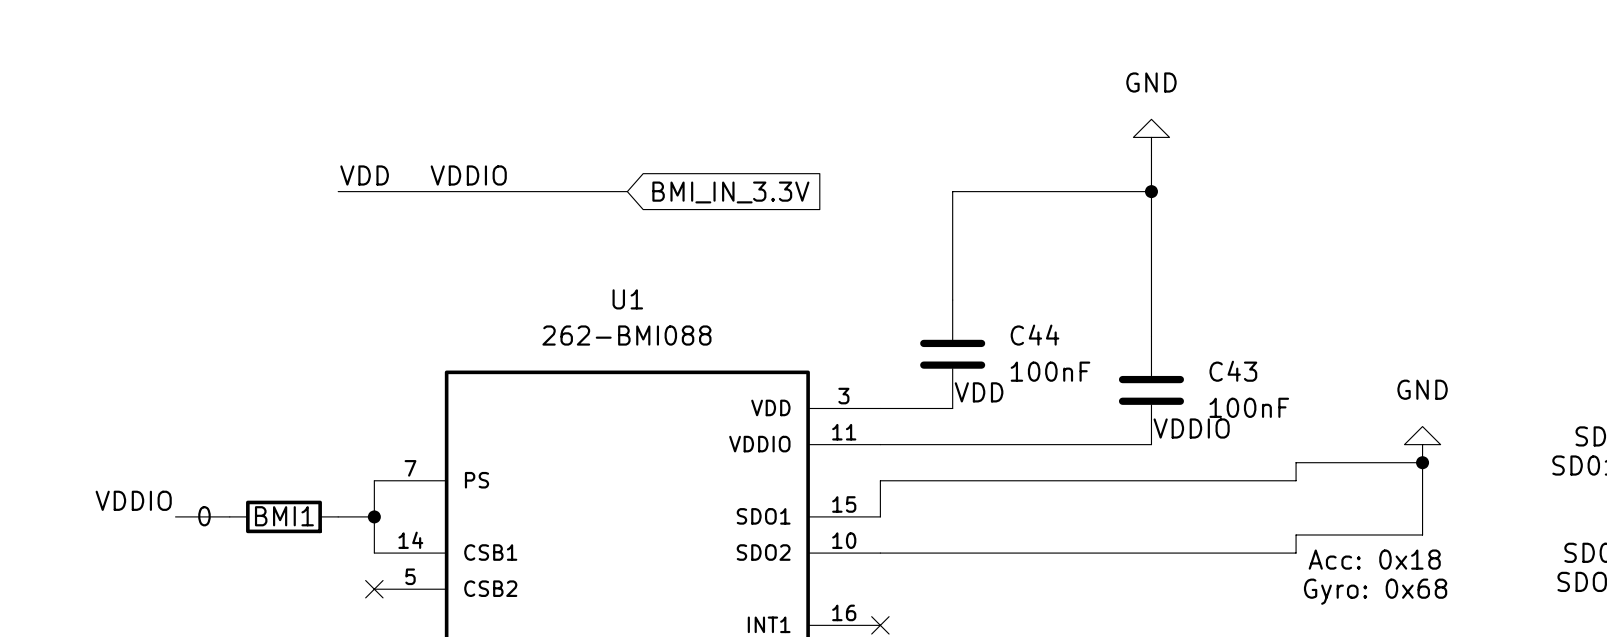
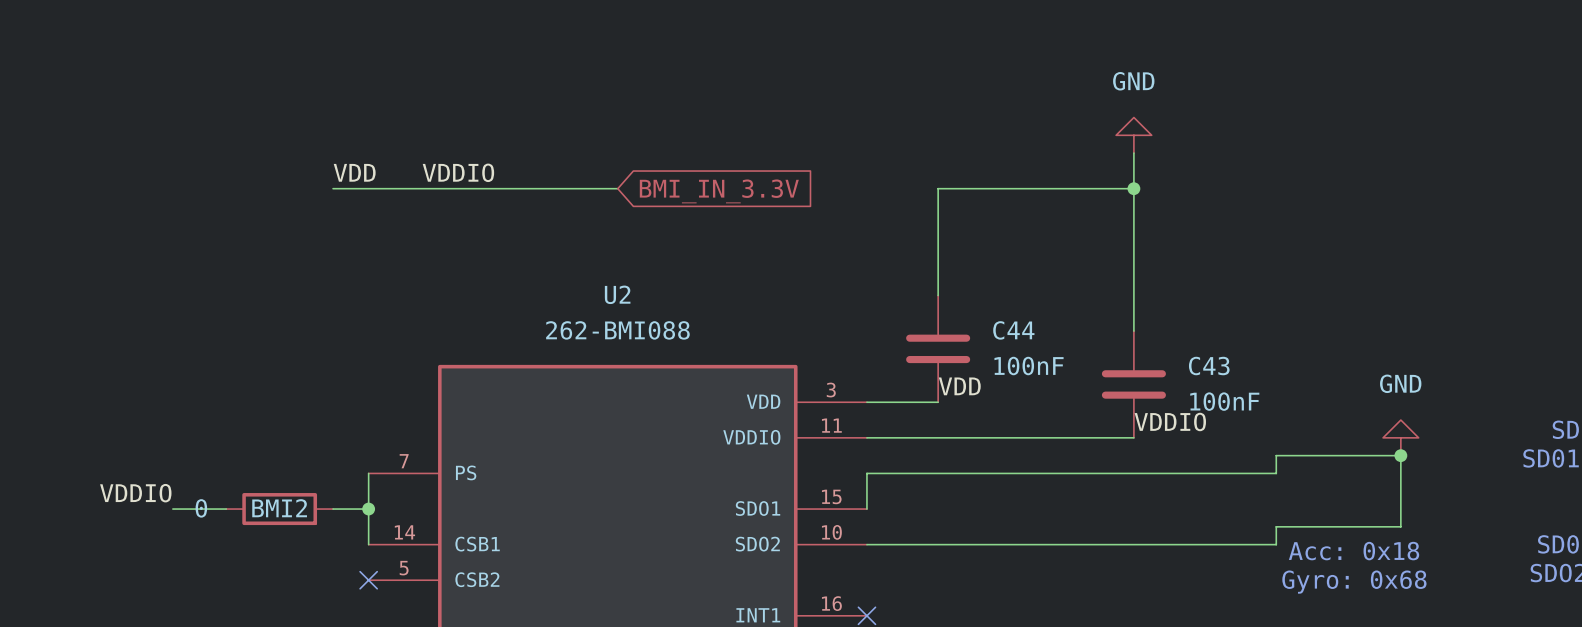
U1 name: U1 (627, 299) -> U2 (617, 294)
BMI1 name: BMI1 (284, 516) -> BMI2 (279, 508)

